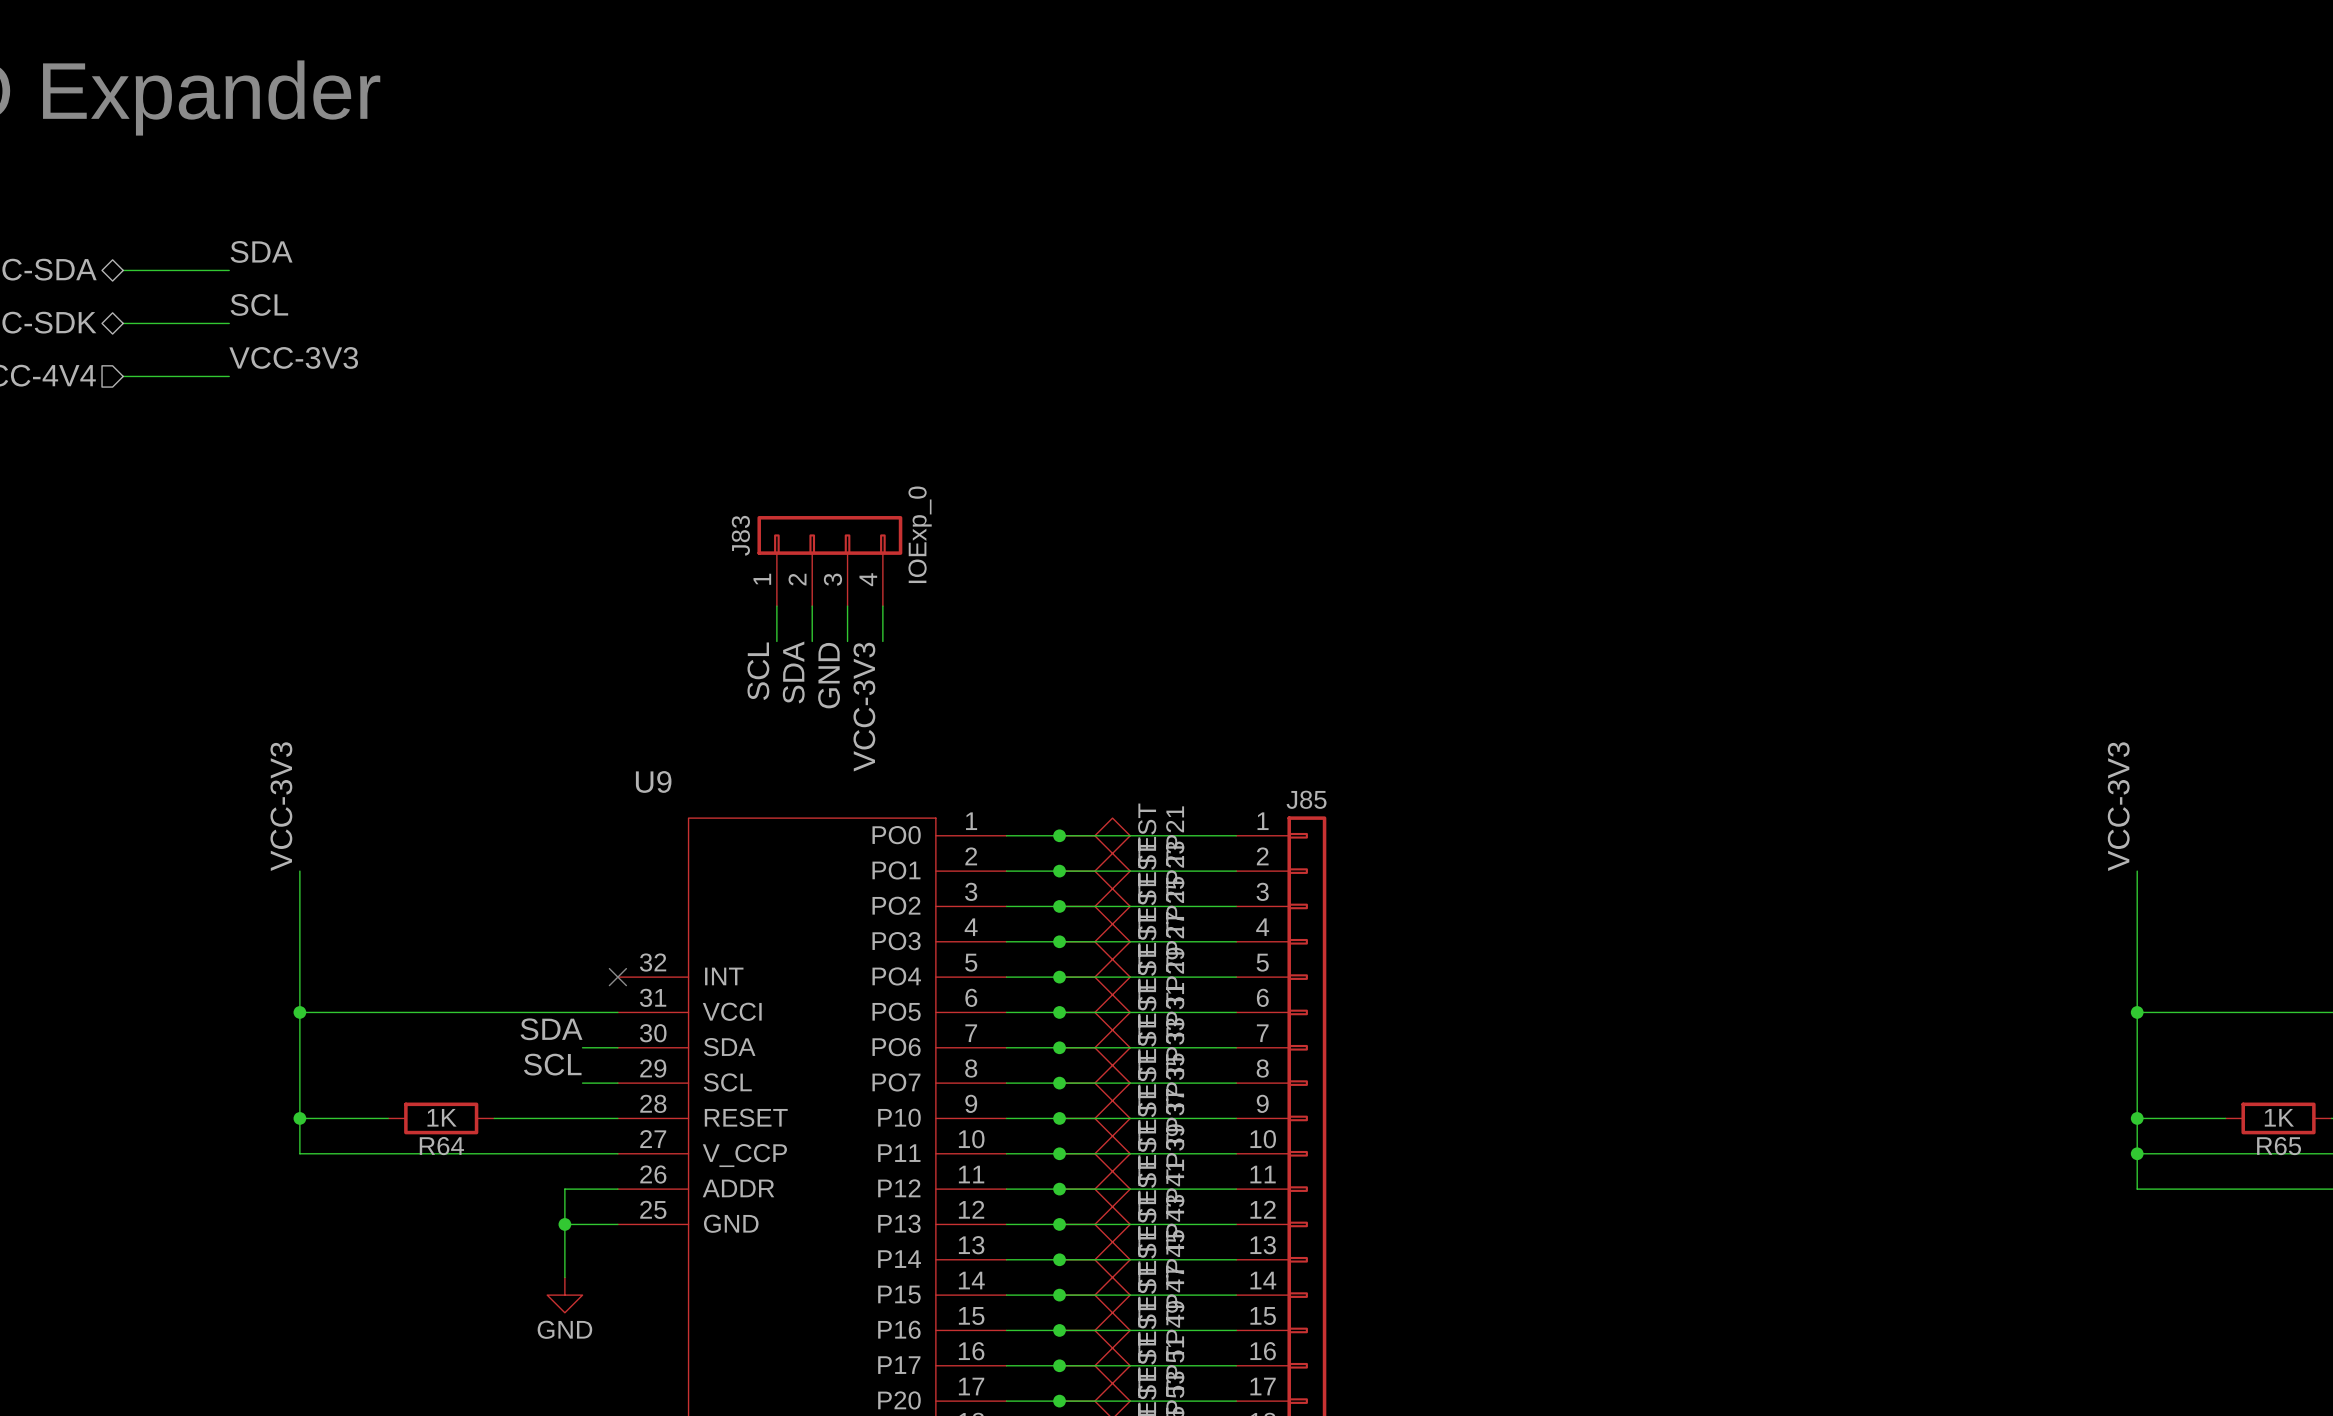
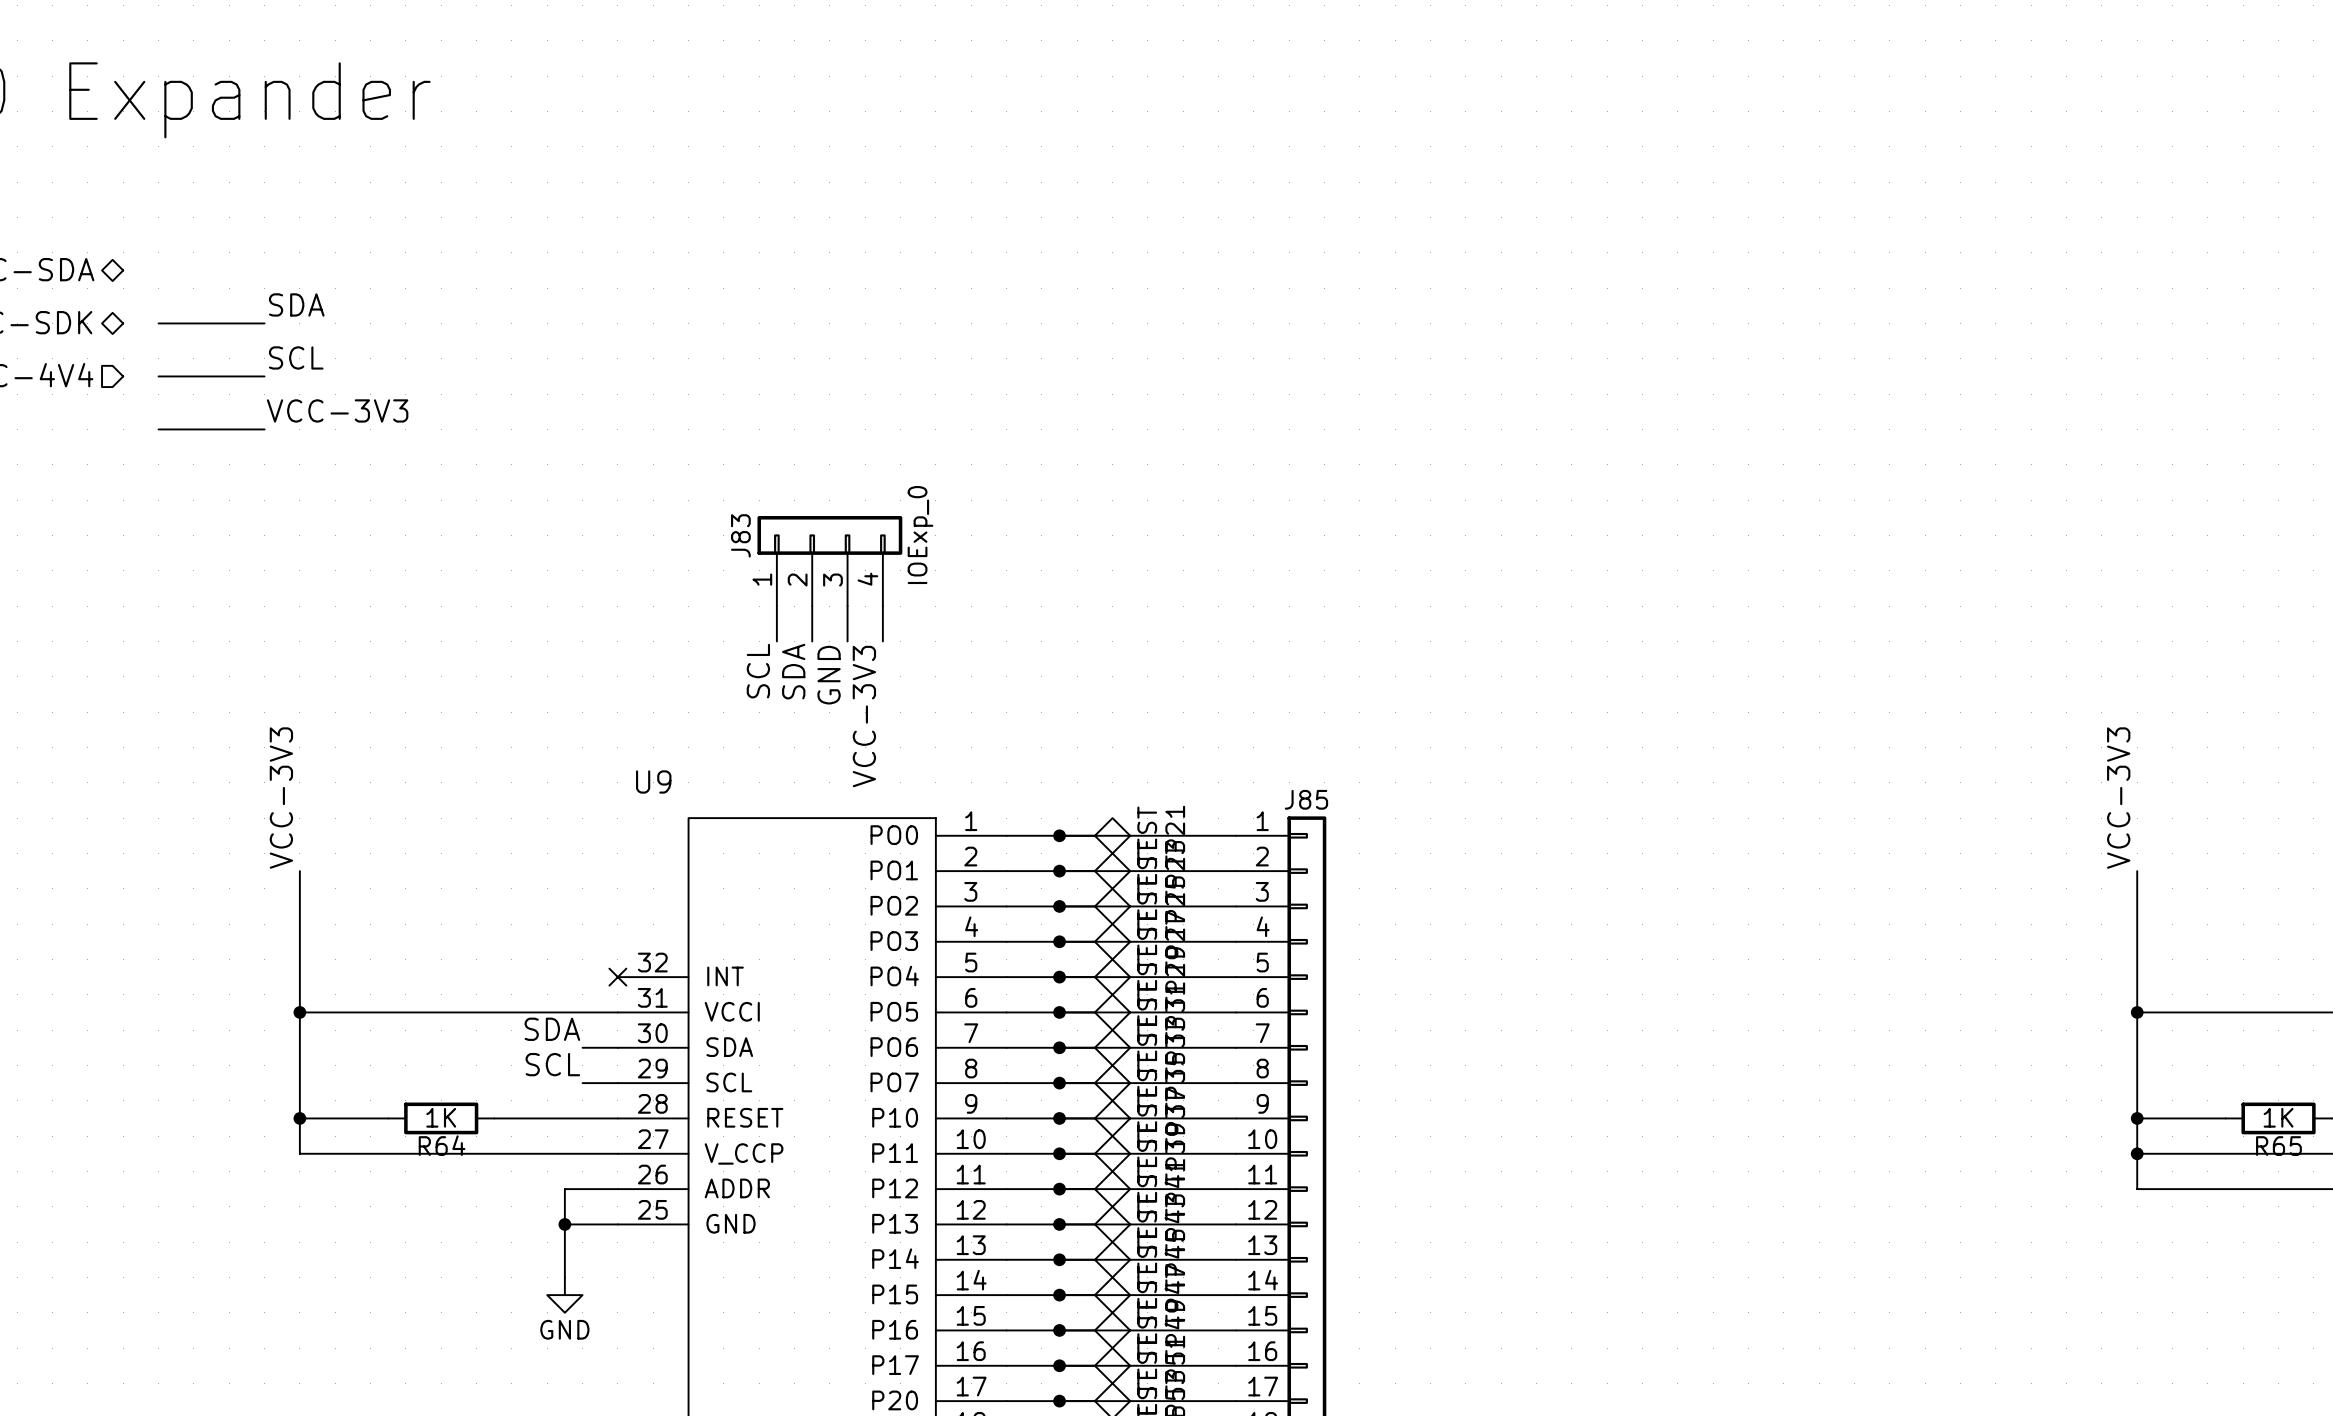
label position: SDA (261, 251) -> SDA (296, 304)
wire: (123, 270) (229, 270) -> (158, 429) (264, 429)
label position: SCL (259, 304) -> SCL (296, 357)
wire: (123, 323) (158, 323) -> (229, 323) (264, 323)
label position: VCC-3V3 (293, 357) -> VCC-3V3 (337, 410)
wire: (123, 376) (158, 376) -> (229, 376) (264, 376)

